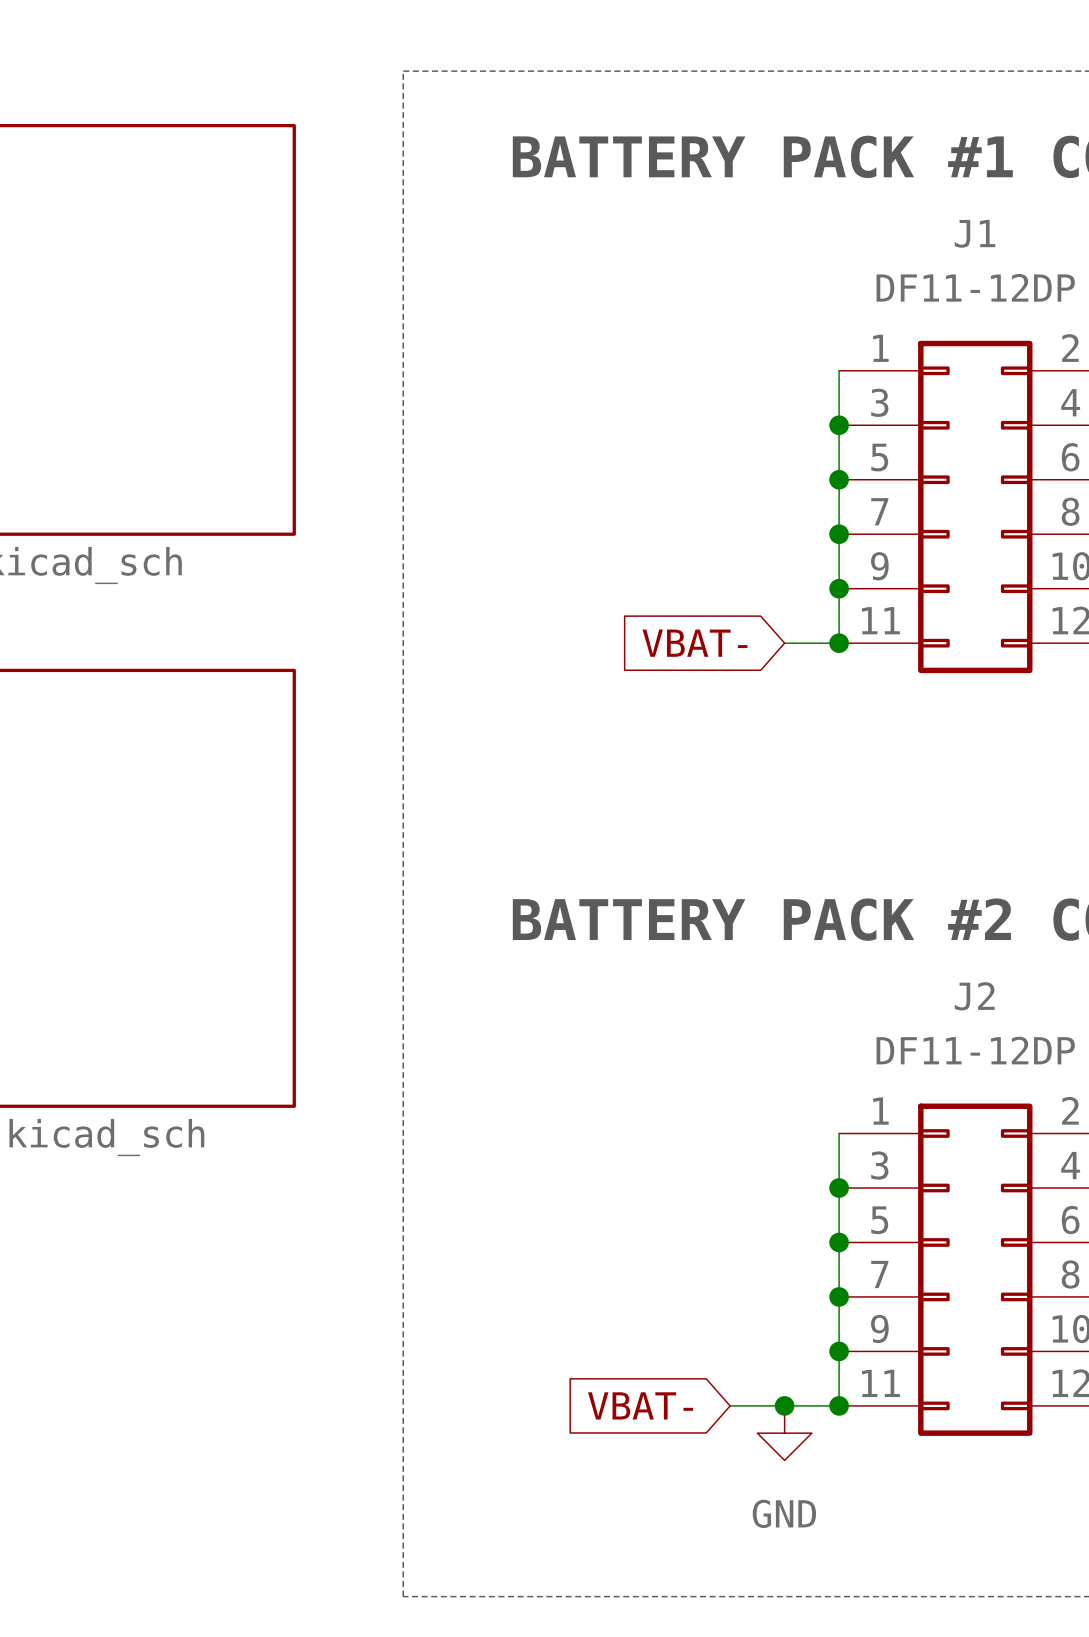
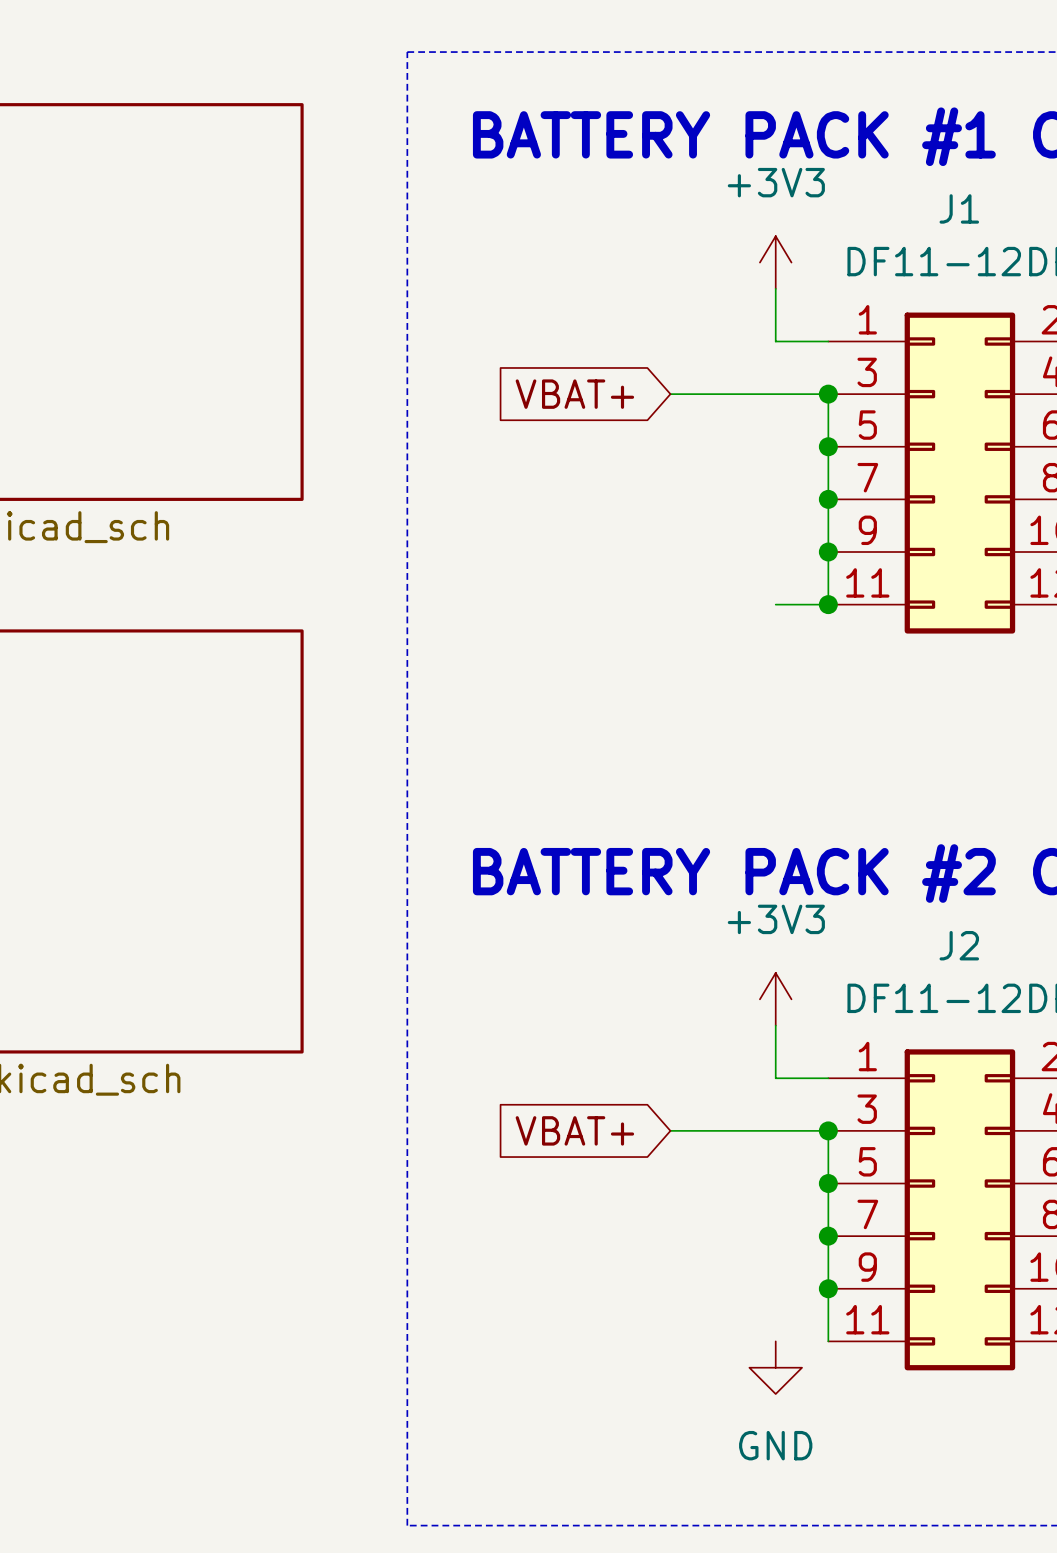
power symbol: none -> +3V3 (775, 262)
wire: (839, 370) (839, 425) -> (828, 341) (775, 341) (775, 288)
global label: none -> VBAT+ (574, 394)
wire: none -> (670, 394) (828, 394)
global label: VBAT- (695, 643) -> none
power symbol: none -> +3V3 (775, 999)
wire: (839, 1133) (839, 1187) -> (828, 1078) (775, 1078) (775, 1025)
global label: none -> VBAT+ (574, 1130)
wire: none -> (670, 1130) (828, 1130)
global label: VBAT- (640, 1405) -> none
wire: (730, 1405) (839, 1405) -> none
junction: (784, 1405) -> none
junction: (839, 1405) -> none

